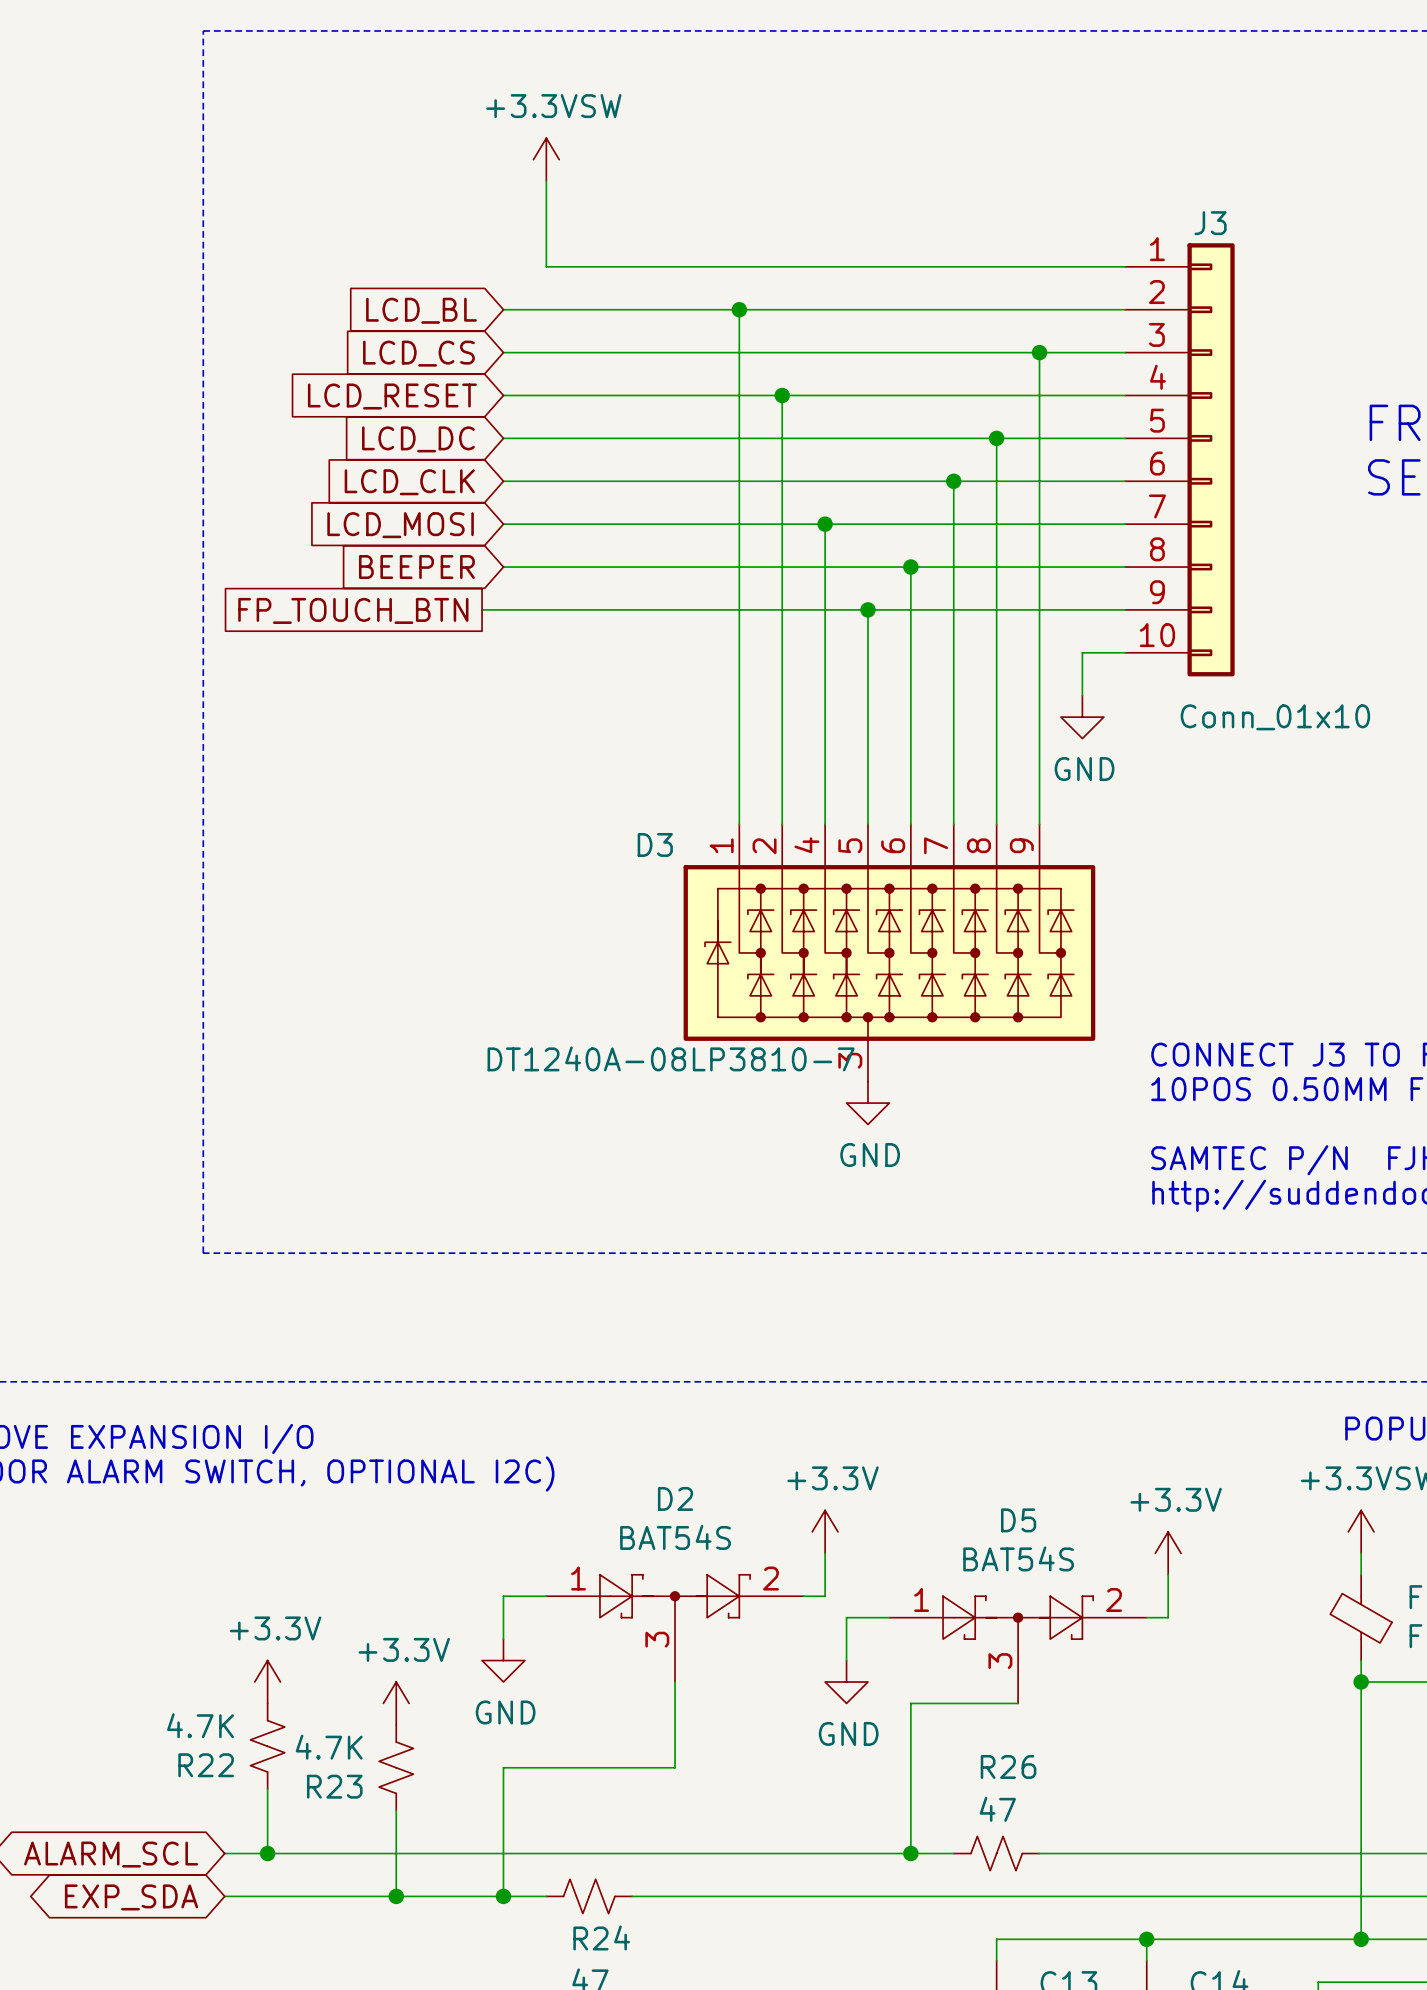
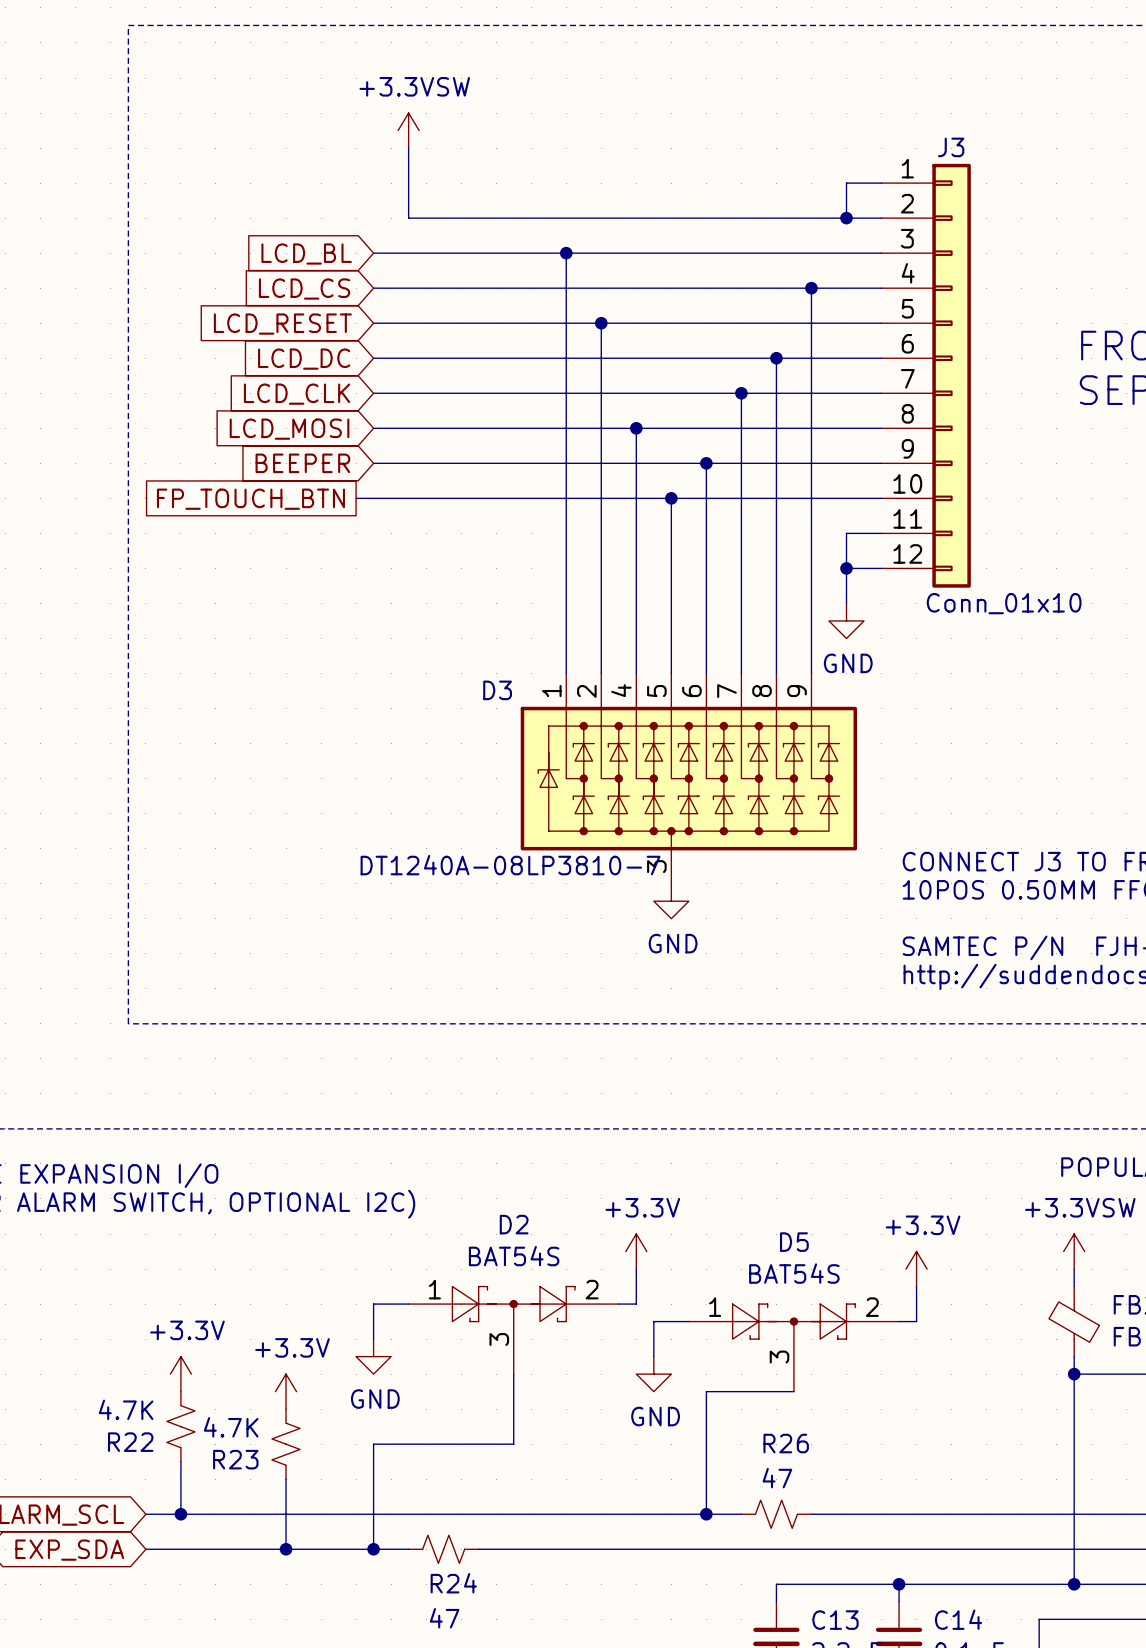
wire: none -> (881, 183) (846, 183) (846, 218)
J3 name position: J3 (1210, 223) -> J3 (951, 147)
J3 symbol: [1125, 243, 1235, 677] -> [881, 163, 971, 588]
junction: none -> (846, 218)
junction: none -> (846, 568)
wire: none -> (881, 568) (846, 568) (846, 603)
power symbol position: GND (1082, 717) -> GND (846, 620)

